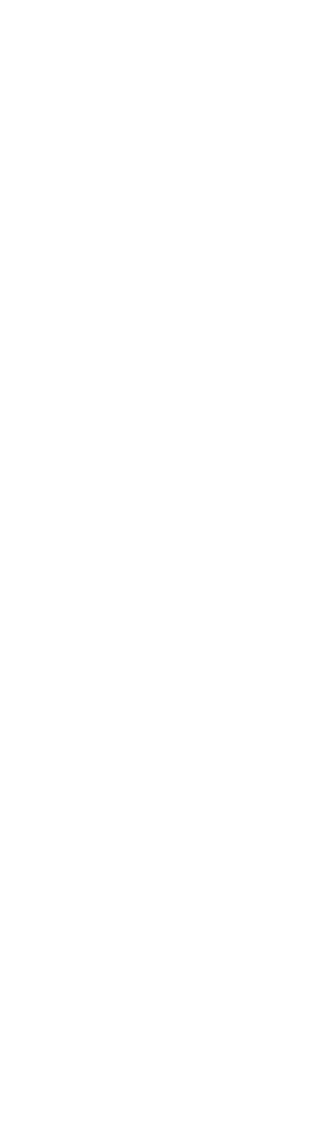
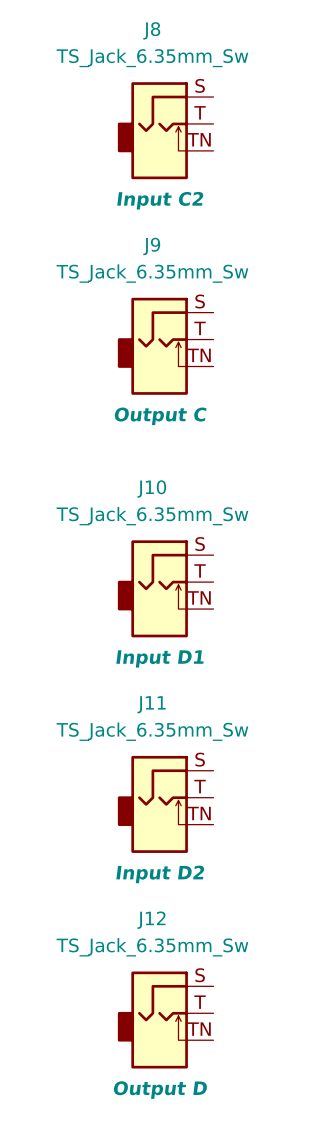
J8: none -> TS_Jack_6.35mm_Sw (165, 130)
J9: none -> TS_Jack_6.35mm_Sw (165, 346)
J10: none -> TS_Jack_6.35mm_Sw (165, 588)
J11: none -> TS_Jack_6.35mm_Sw (165, 804)
J12: none -> TS_Jack_6.35mm_Sw (165, 1020)

